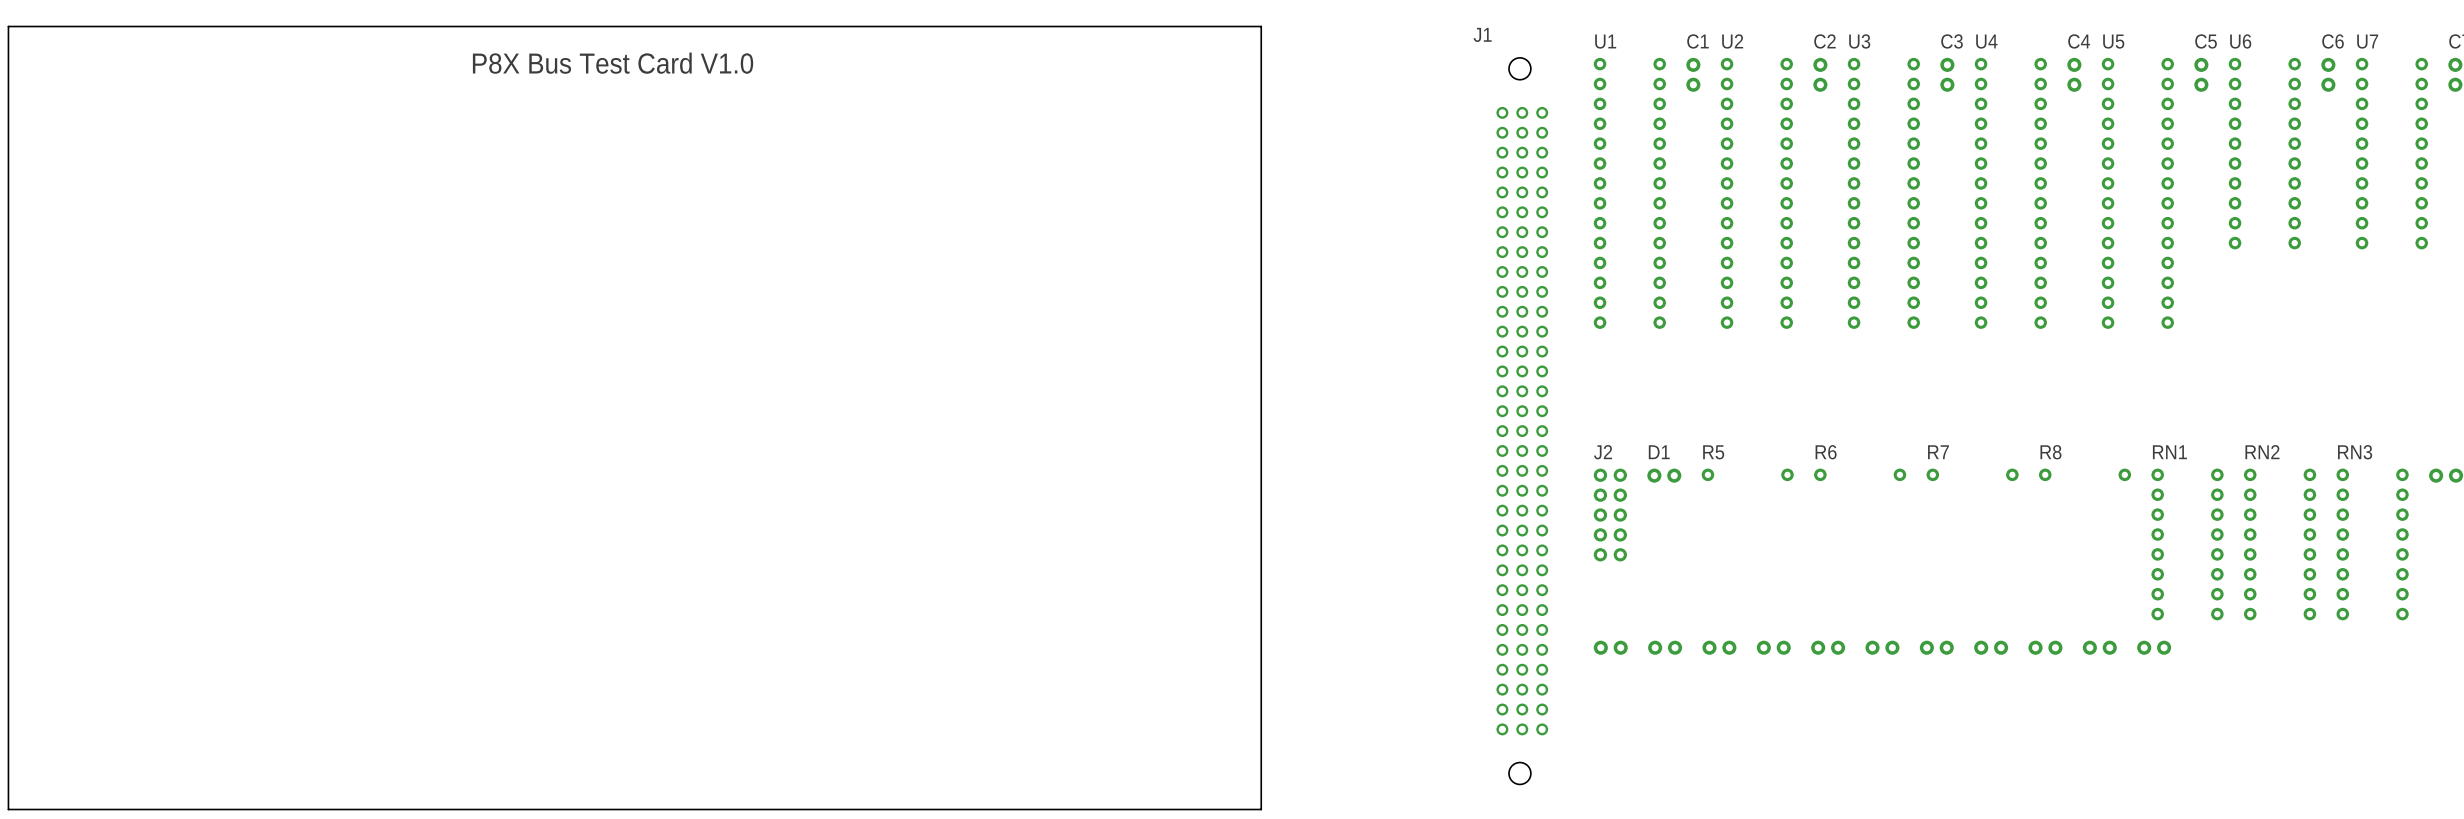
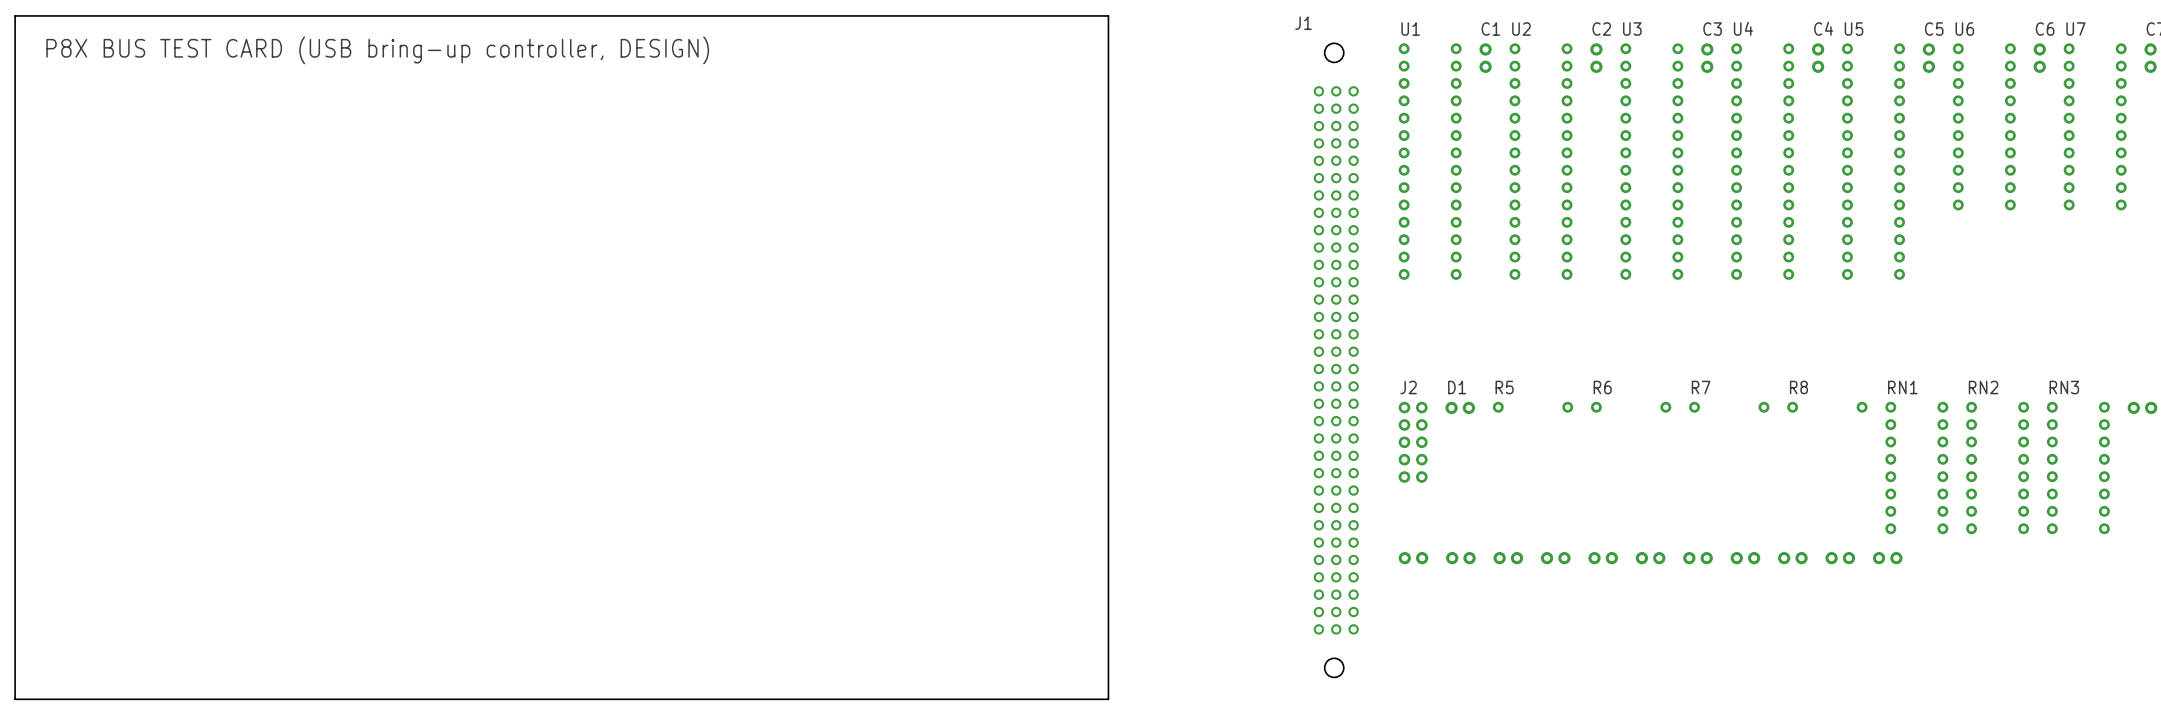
text: P8X Bus Test Card V1.0 (613, 63) -> none
text: none -> P8X BUS TEST CARD (USB bring-up controller, DESIGN) (377, 50)

